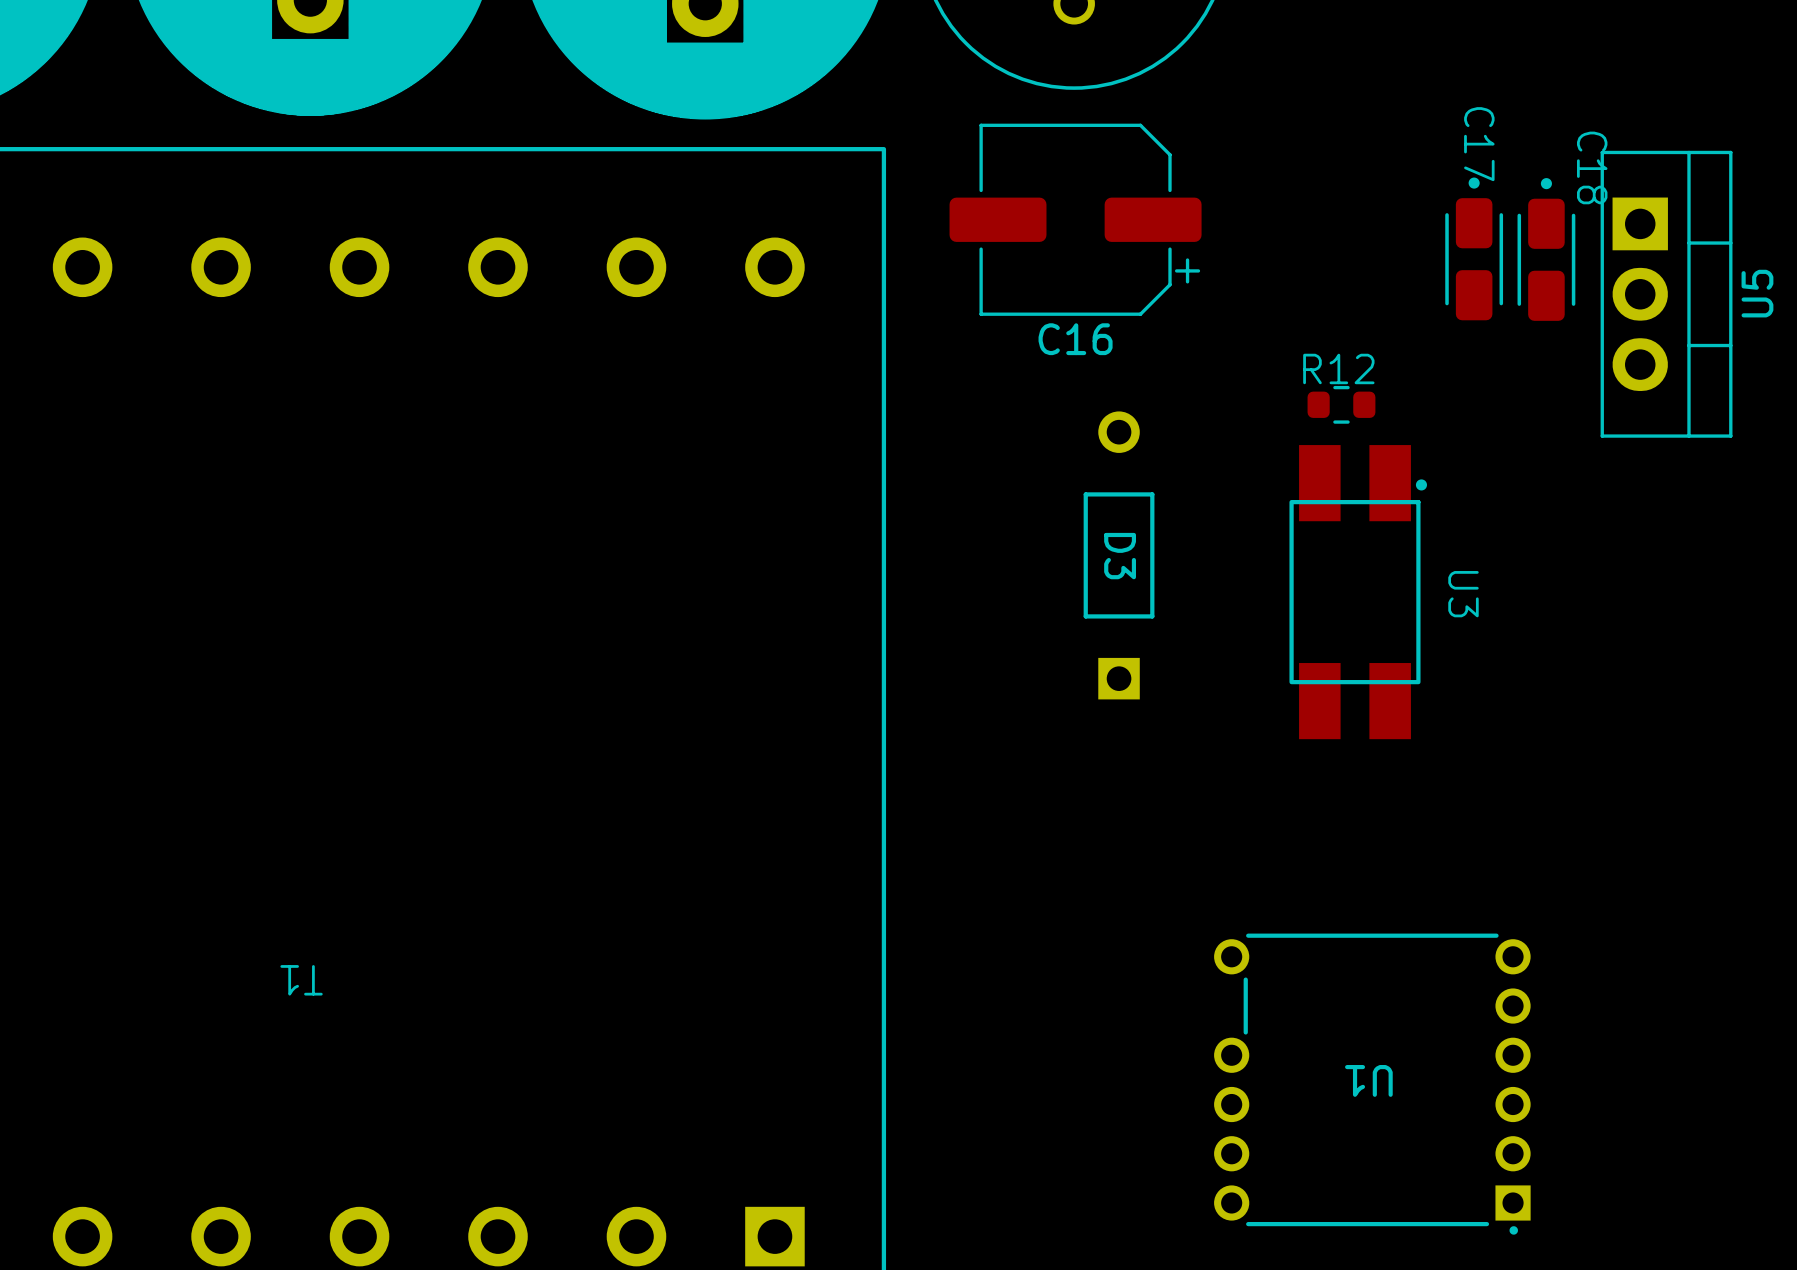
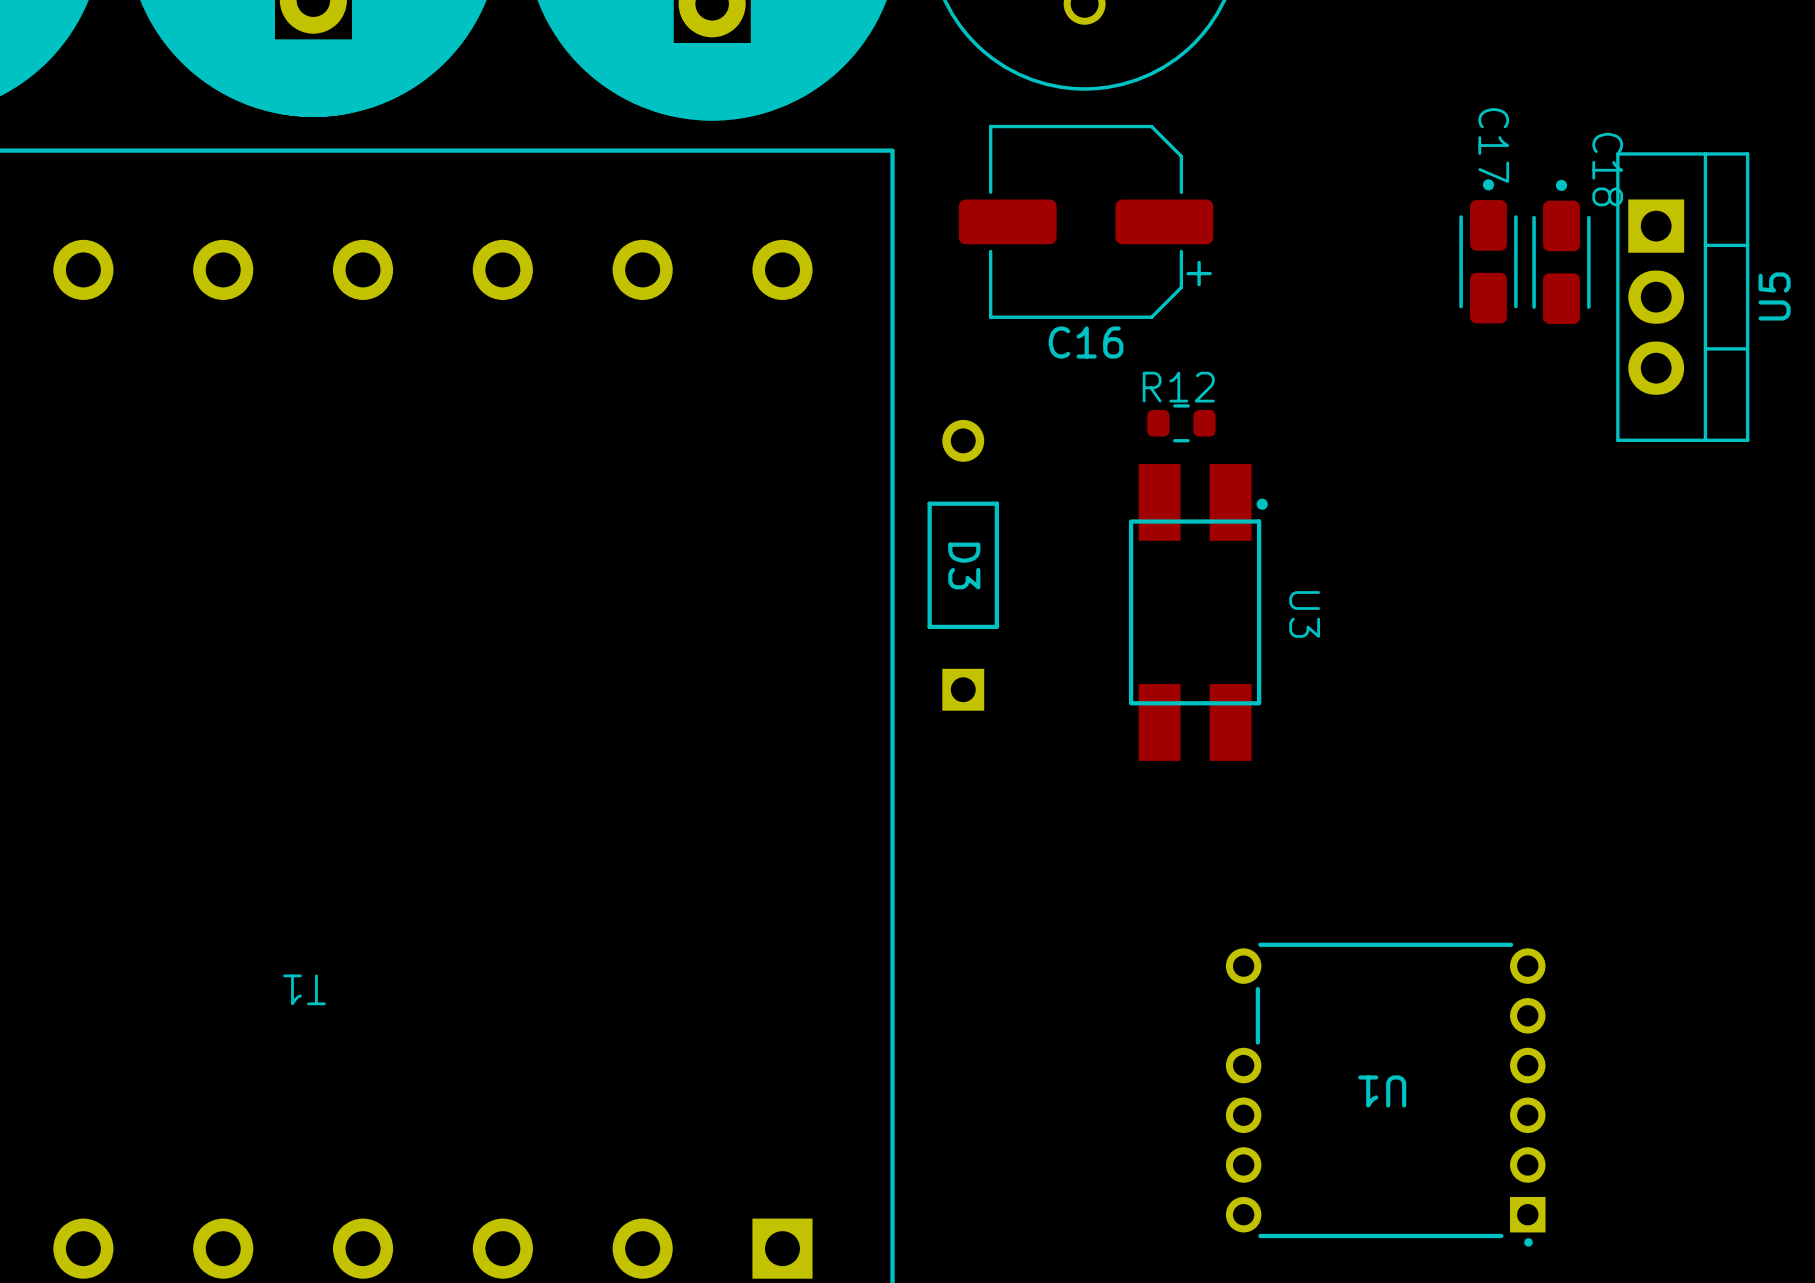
R12 position: (1341, 404) -> (1181, 423)
D3 position: (1119, 555) -> (963, 565)
U3 position: (1358, 592) -> (1198, 612)

